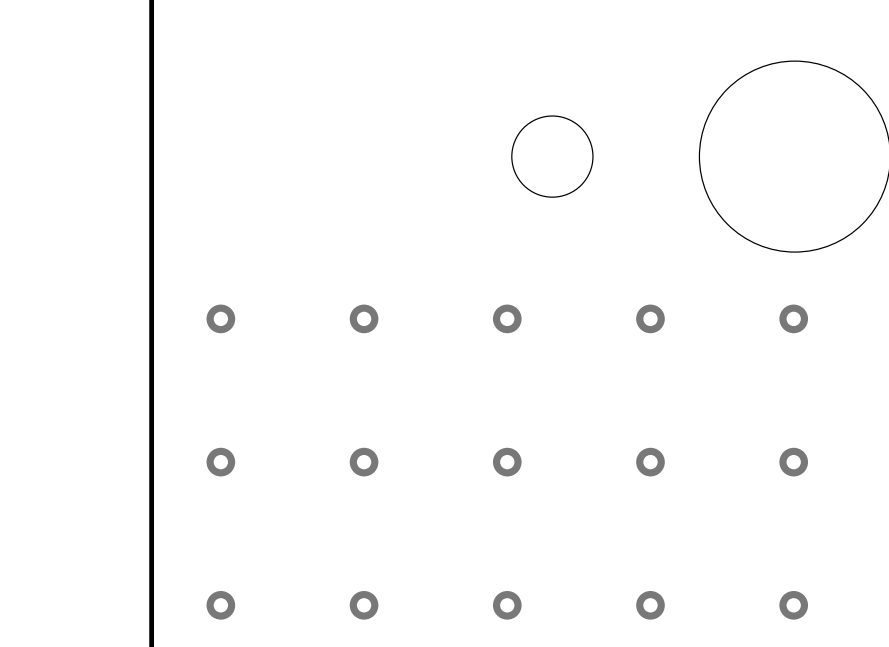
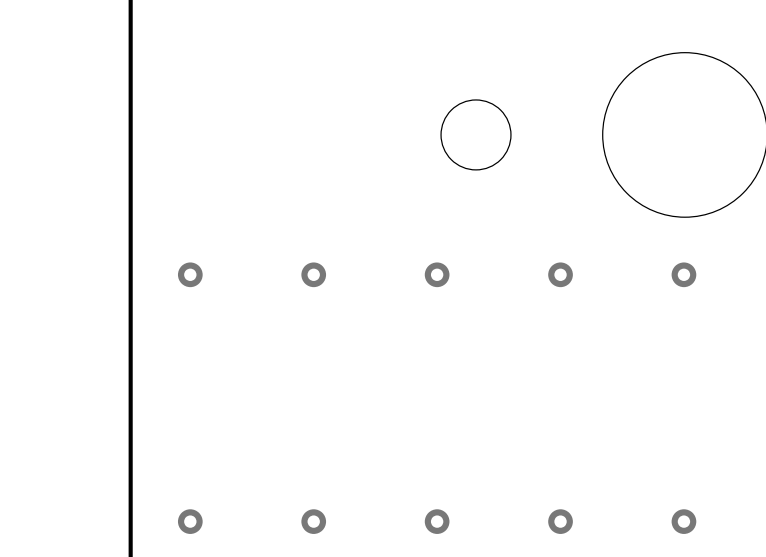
via: (220, 462) -> none
via: (364, 462) -> none
via: (507, 462) -> none
via: (650, 462) -> none
via: (793, 462) -> none

